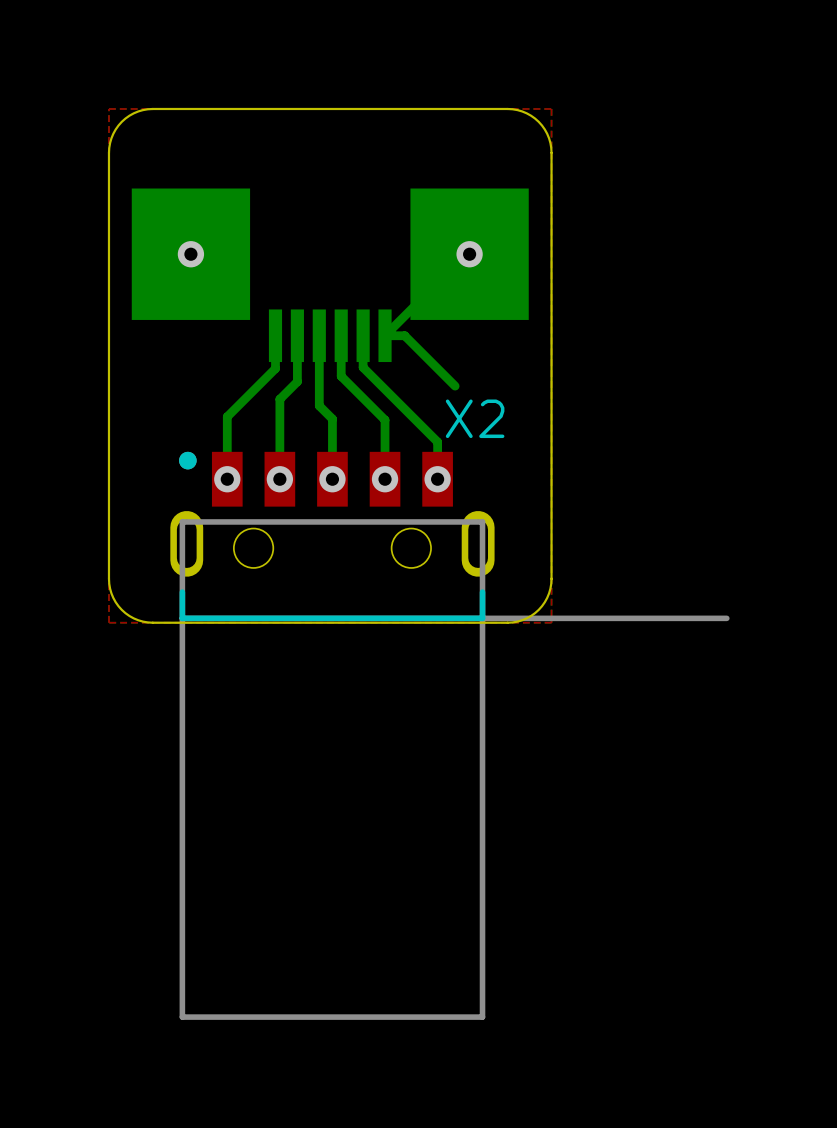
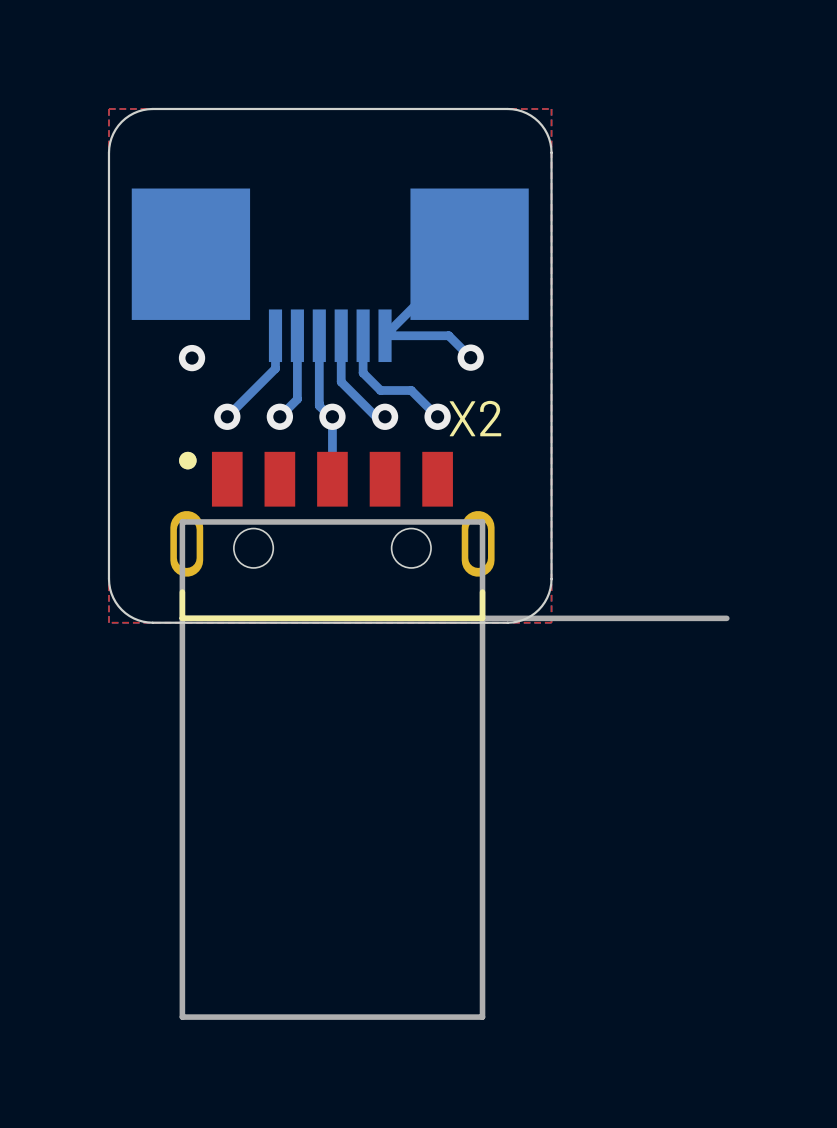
via: (190, 254) -> none
via: (469, 254) -> none
bottom track: (404, 335) (455, 386) -> (404, 335) (448, 335) (470, 357)
via: none -> (470, 357)
via: none -> (192, 358)
bottom track: (363, 367) (437, 441) (437, 479) -> (363, 367) (363, 372) (380, 390) (411, 390) (437, 416)
bottom track: (341, 376) (385, 420) (385, 479) -> (341, 376) (341, 381) (376, 416) (385, 416)
bottom track: (297, 381) (279, 399) (279, 479) -> (297, 381) (297, 399) (279, 416)
bottom track: (227, 416) (227, 479) -> none
via: none -> (227, 416)
via: none -> (279, 416)
via: none -> (332, 416)
via: none -> (385, 416)
via: none -> (437, 416)
via: (227, 479) -> none
via: (279, 479) -> none
via: (332, 479) -> none
via: (385, 479) -> none
via: (437, 479) -> none

